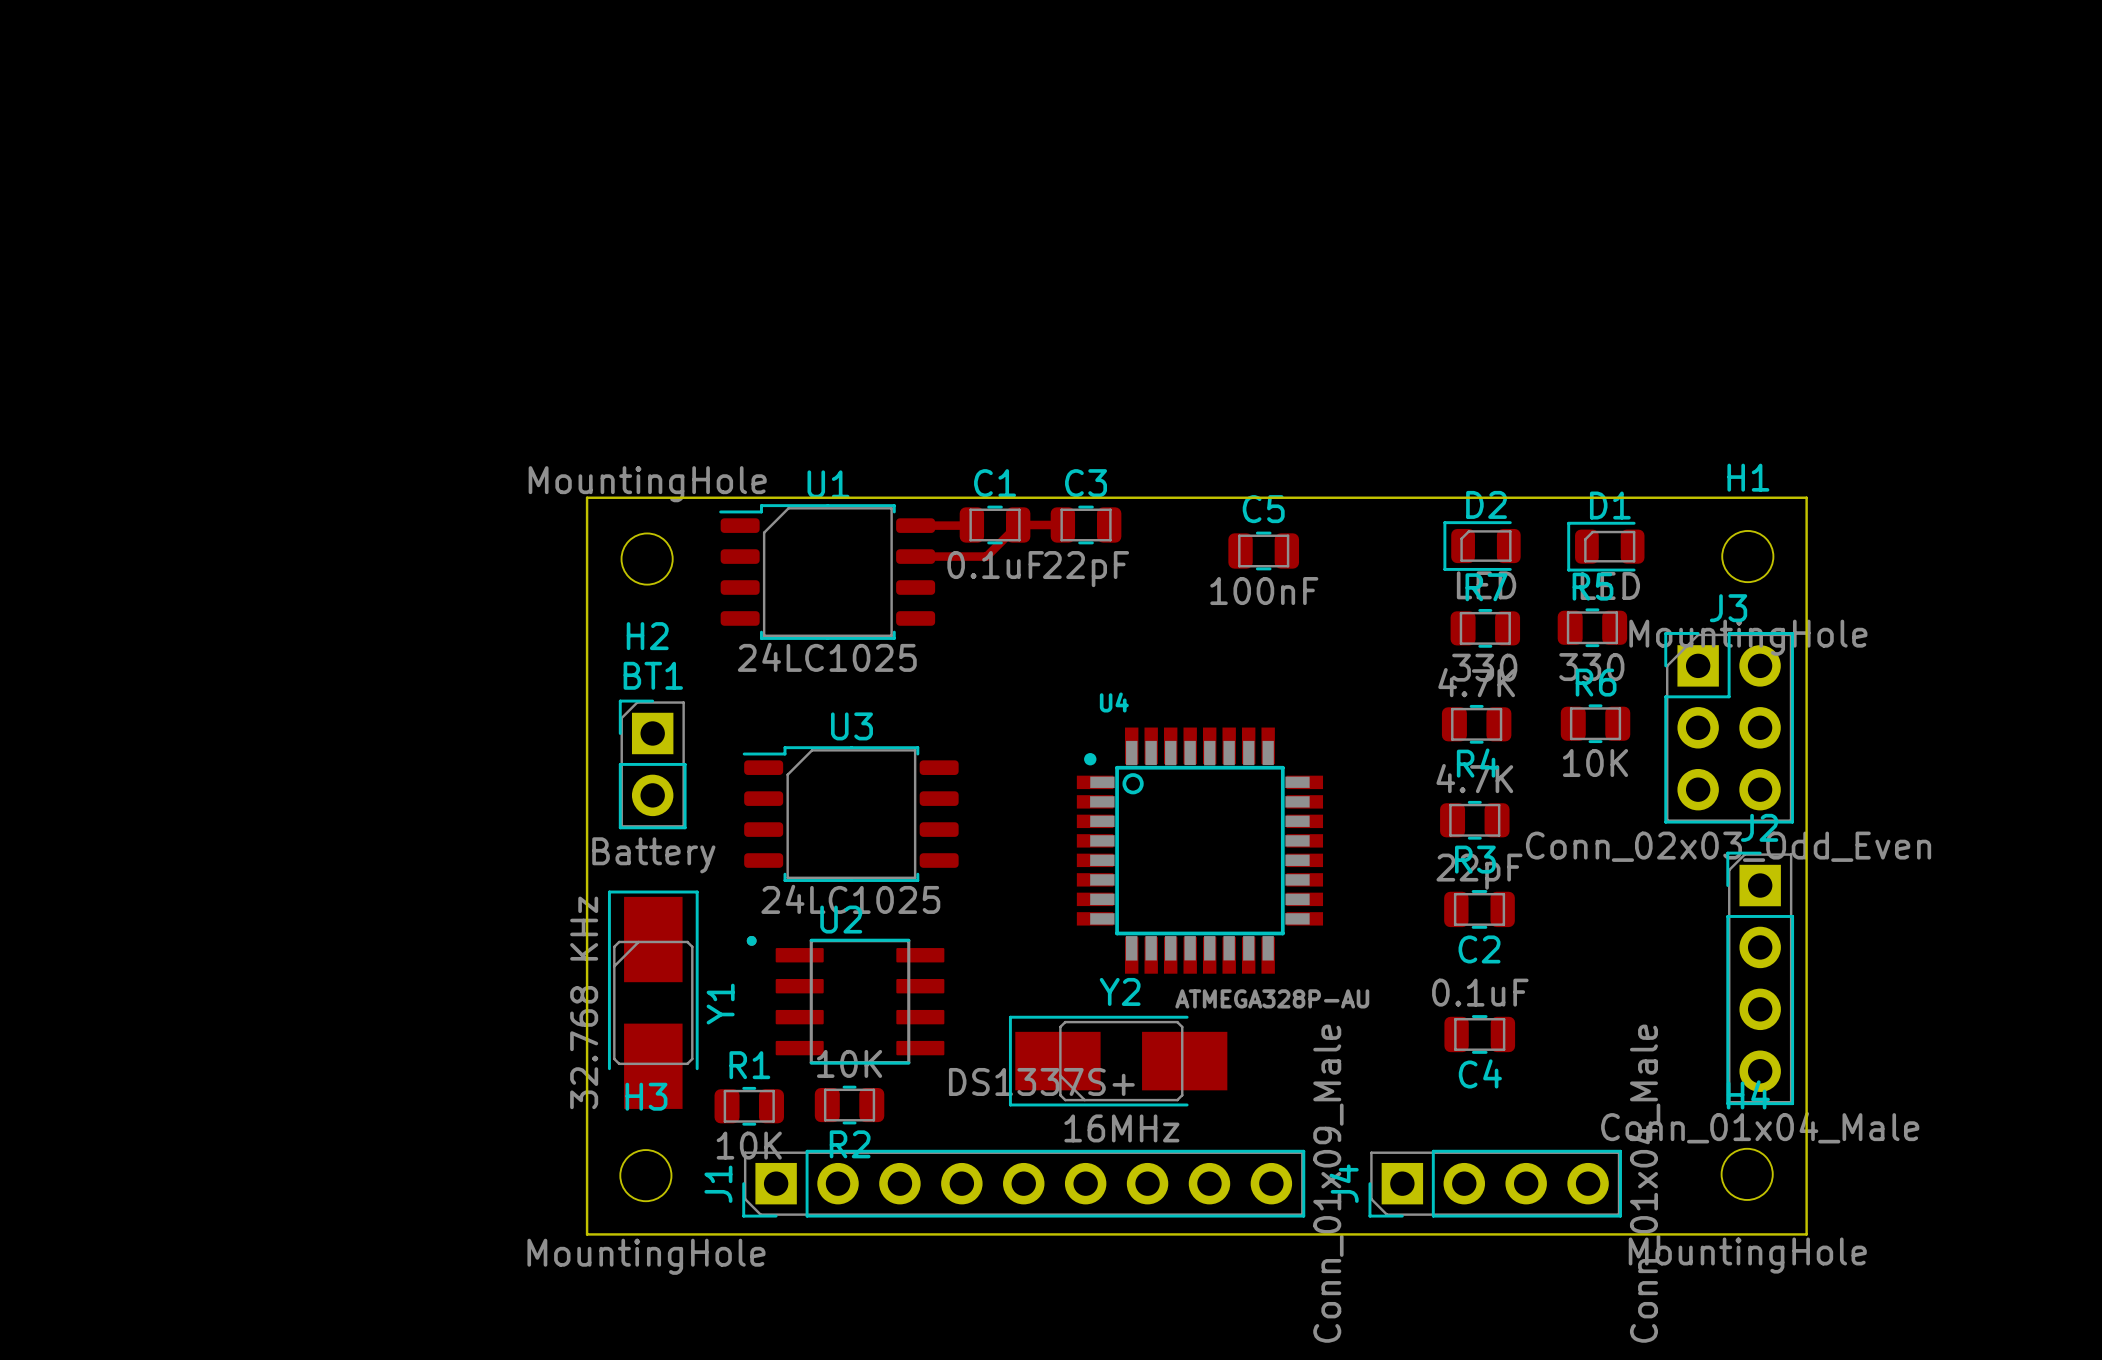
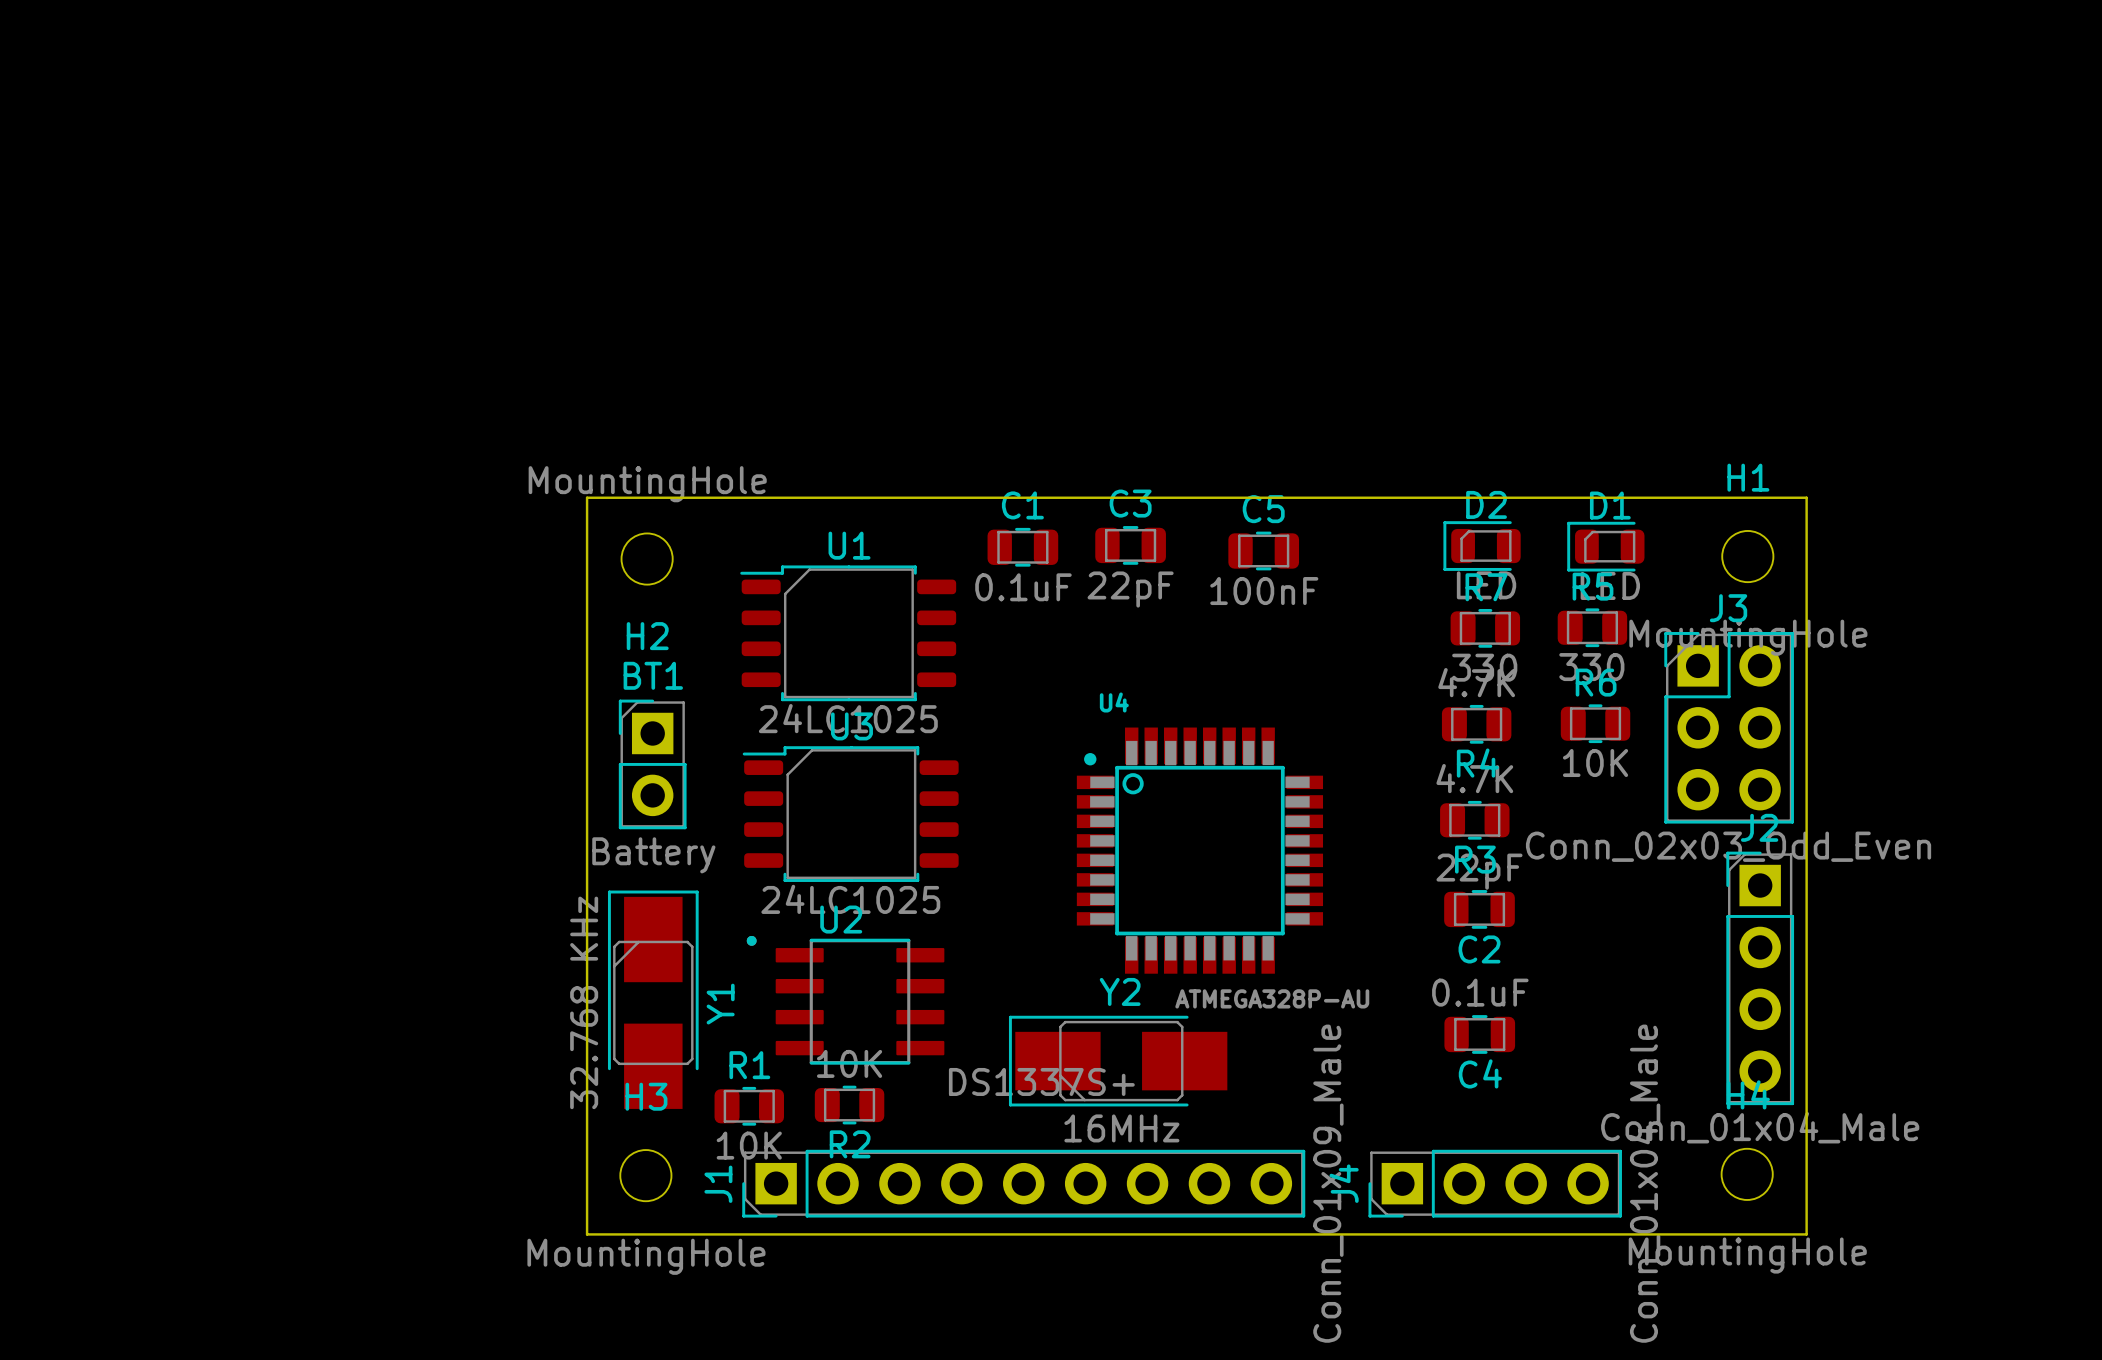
top track: (971, 524) (915, 525) -> none
C1 position: (995, 524) -> (1022, 547)
top track: (1062, 524) (1018, 524) (986, 556) (915, 556) -> none
C3 position: (1086, 524) -> (1130, 545)
U1 position: (827, 572) -> (848, 633)

